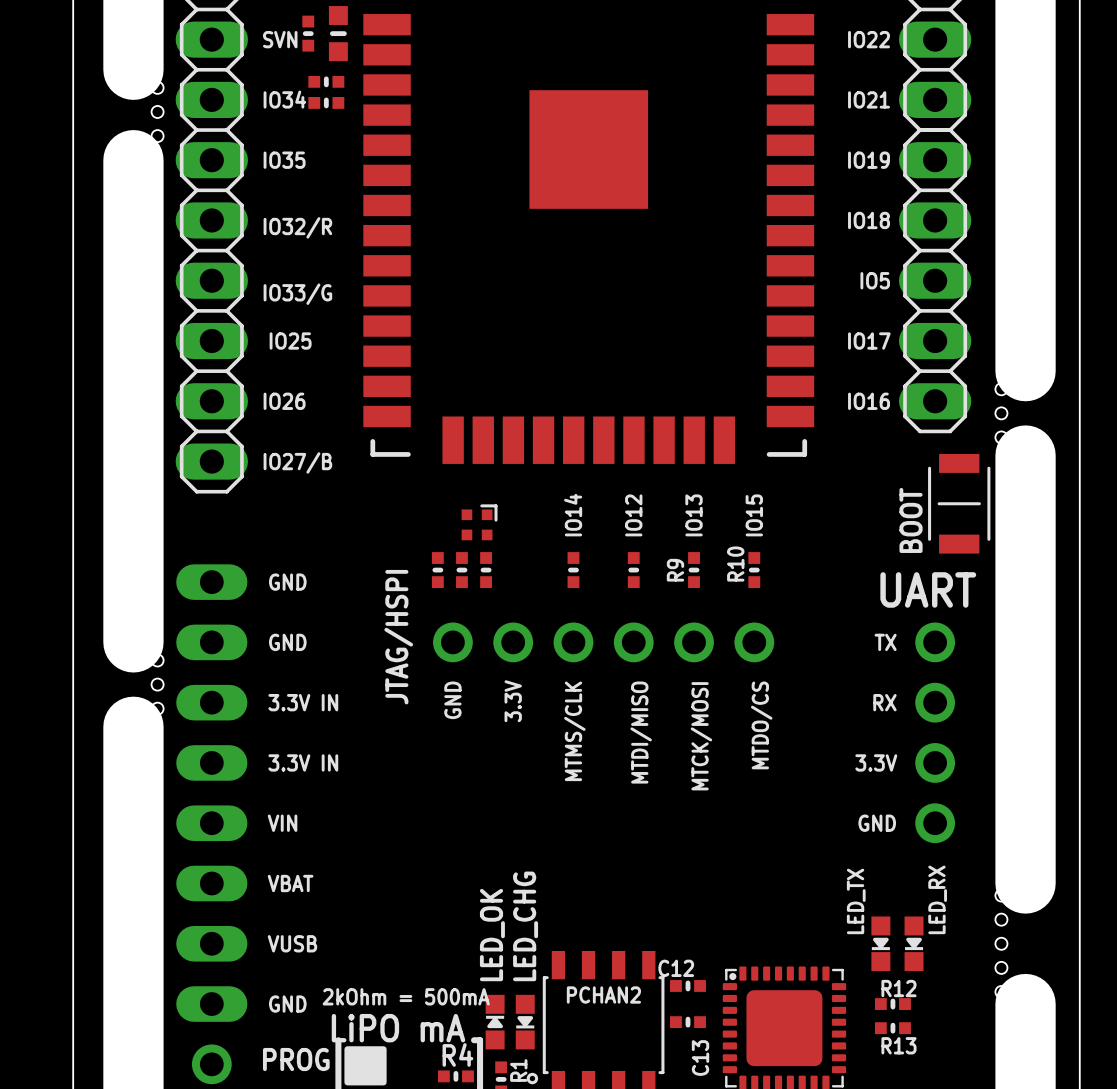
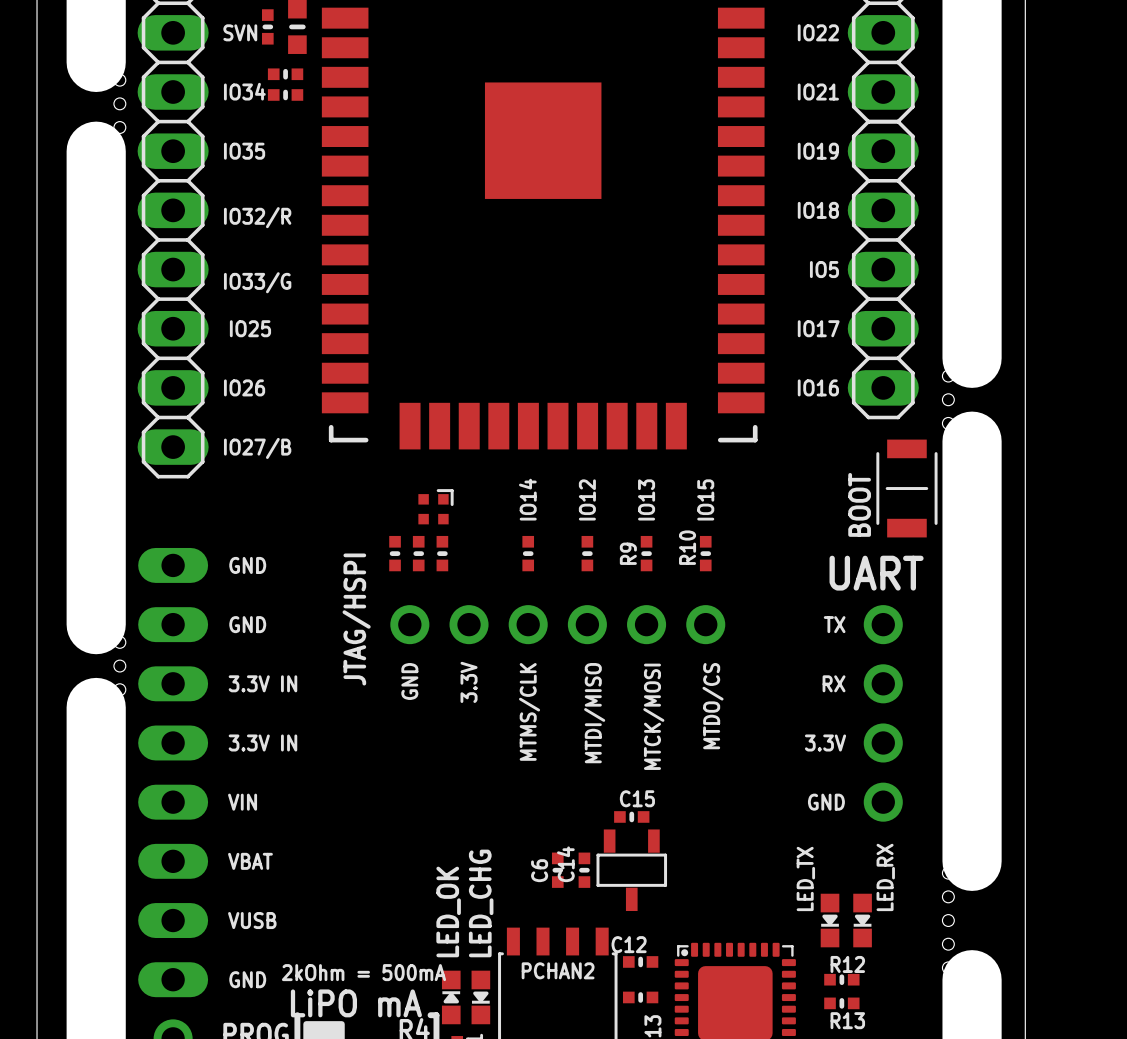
C15: none -> (631, 816)
C6: none -> (557, 870)
C14: none -> (584, 870)
part: none -> (631, 870)

